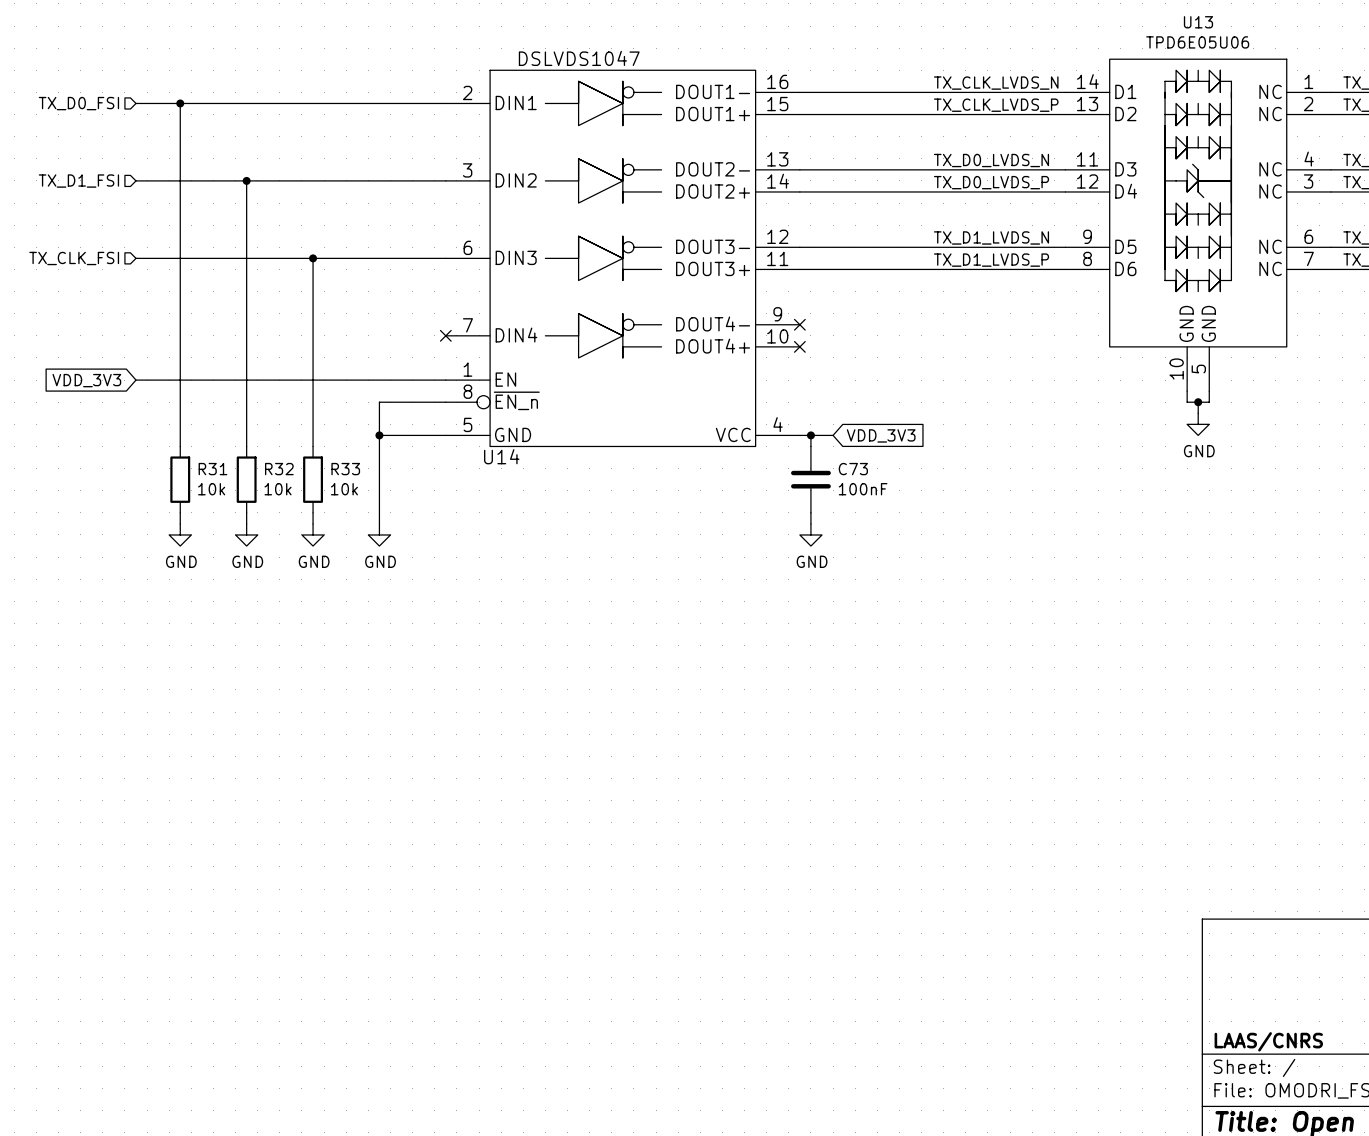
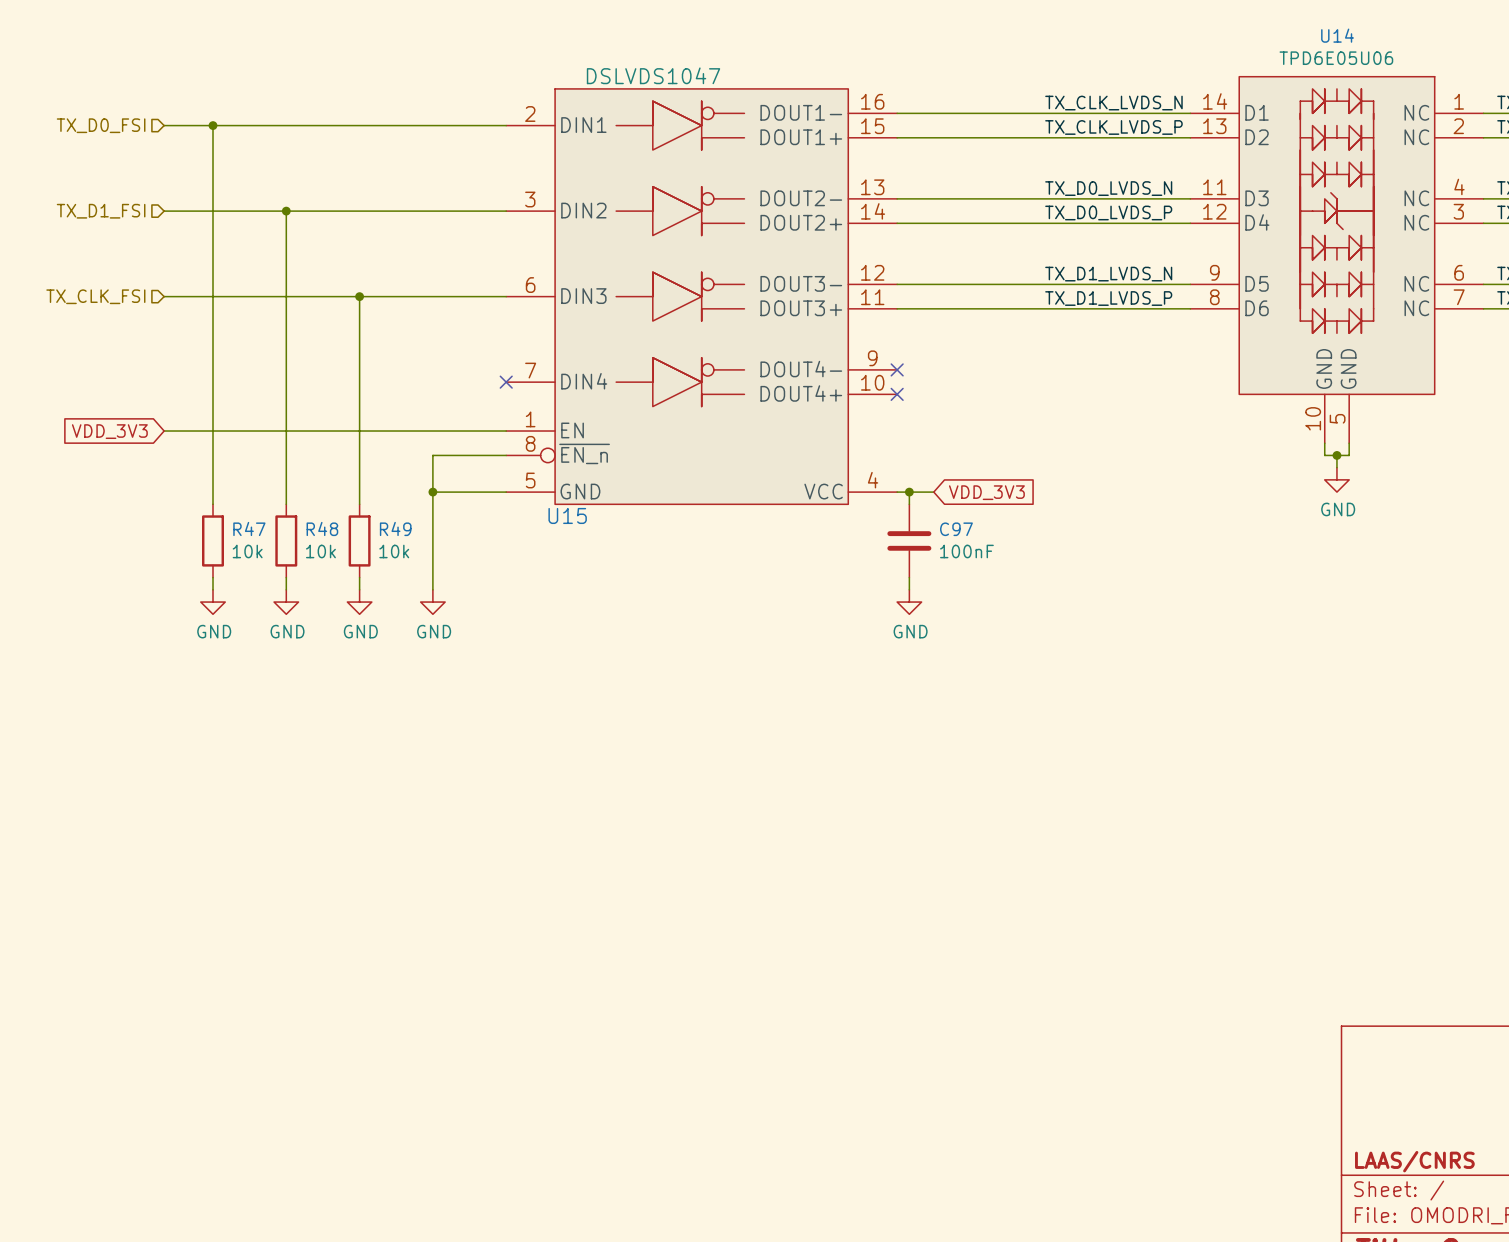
U13 name: U13 (1198, 22) -> U14 (1337, 35)
U14 name: U14 (501, 456) -> U15 (567, 515)
R31 name: R31 (212, 469) -> R47 (249, 528)
R32 name: R32 (279, 469) -> R48 (322, 528)
R33 name: R33 (345, 469) -> R49 (395, 528)
C73 name: C73 (853, 469) -> C97 (956, 529)

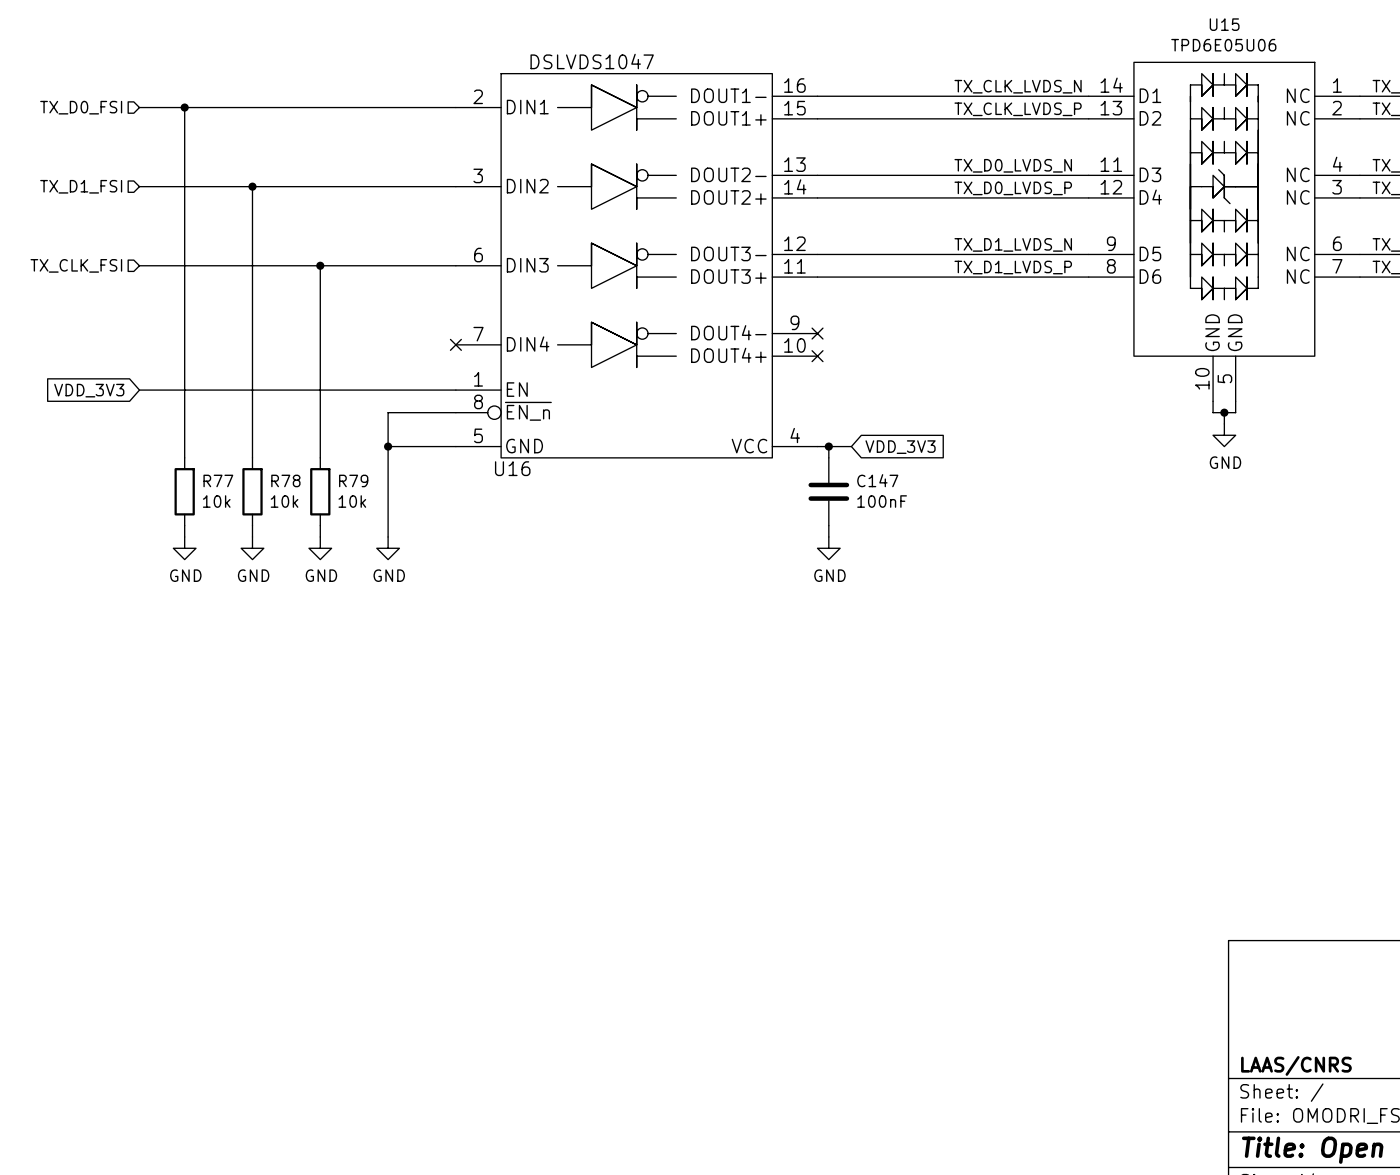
U14 name: U14 (1337, 35) -> U15 (1224, 24)
U15 name: U15 (567, 515) -> U16 (512, 468)
R47 name: R47 (249, 528) -> R77 (218, 480)
R48 name: R48 (322, 528) -> R78 (285, 480)
R49 name: R49 (395, 528) -> R79 (353, 480)
C97 name: C97 (956, 529) -> C147 (877, 480)

